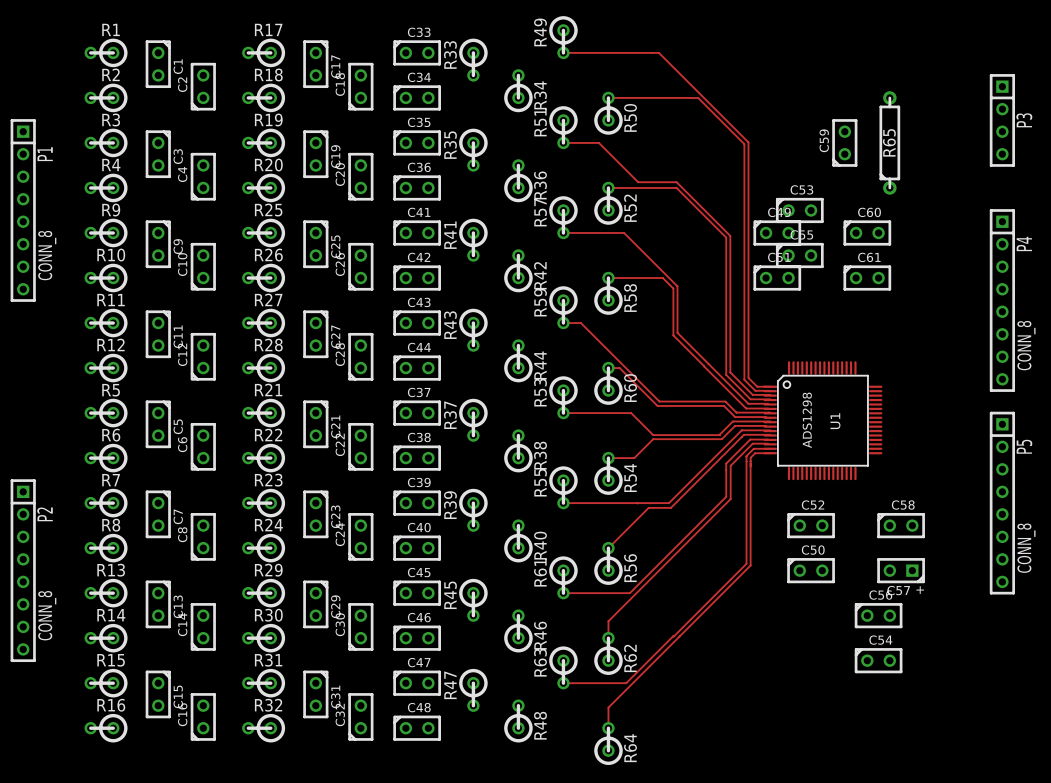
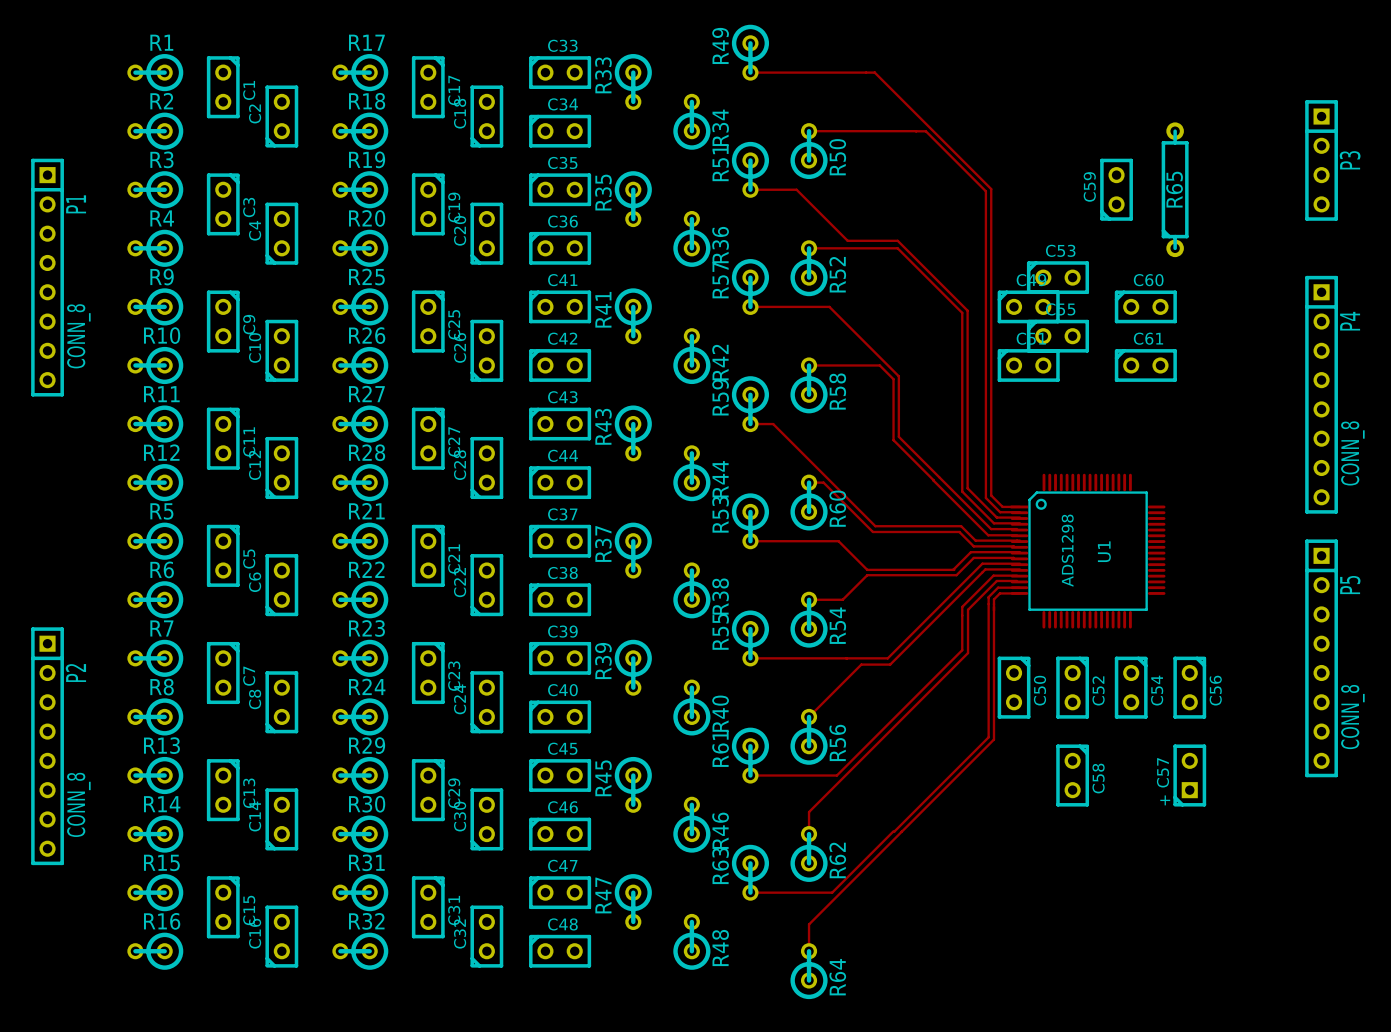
C52 rotation: 0° (811, 525) -> 90° clockwise (1072, 687)
C58 rotation: 0° (901, 525) -> 90° clockwise (1072, 775)
C58 position: (901, 525) -> (1072, 775)
C50 rotation: 0° (811, 570) -> 90° clockwise (1014, 687)
C50 position: (811, 570) -> (1014, 687)
C57 rotation: 0° (901, 570) -> 90° clockwise (1189, 775)
C56 rotation: 0° (878, 615) -> 90° clockwise (1189, 687)
C56 position: (878, 615) -> (1189, 687)
C54 rotation: 0° (878, 660) -> 90° clockwise (1131, 687)
C54 position: (878, 660) -> (1131, 687)

